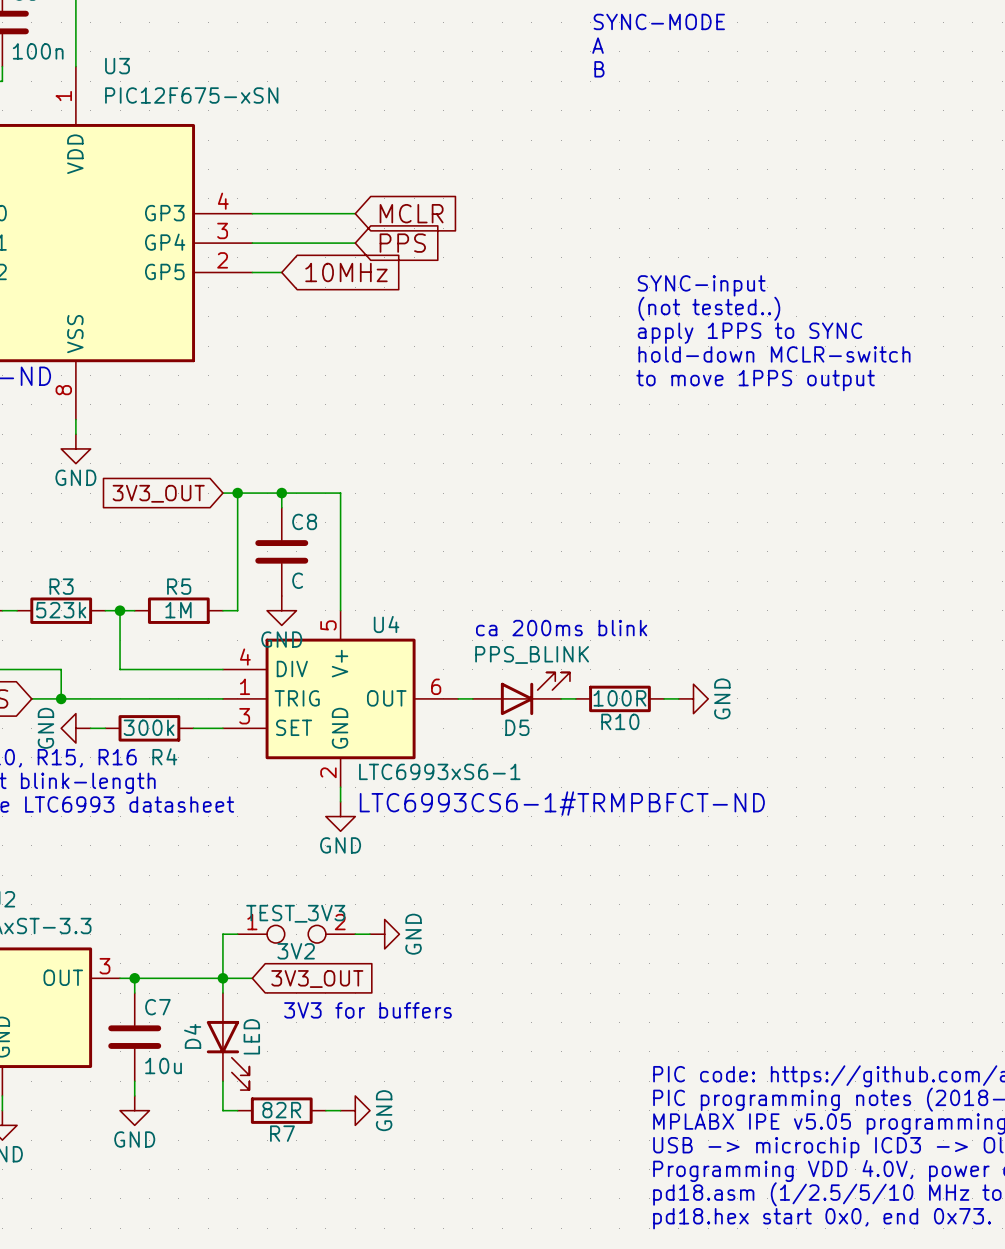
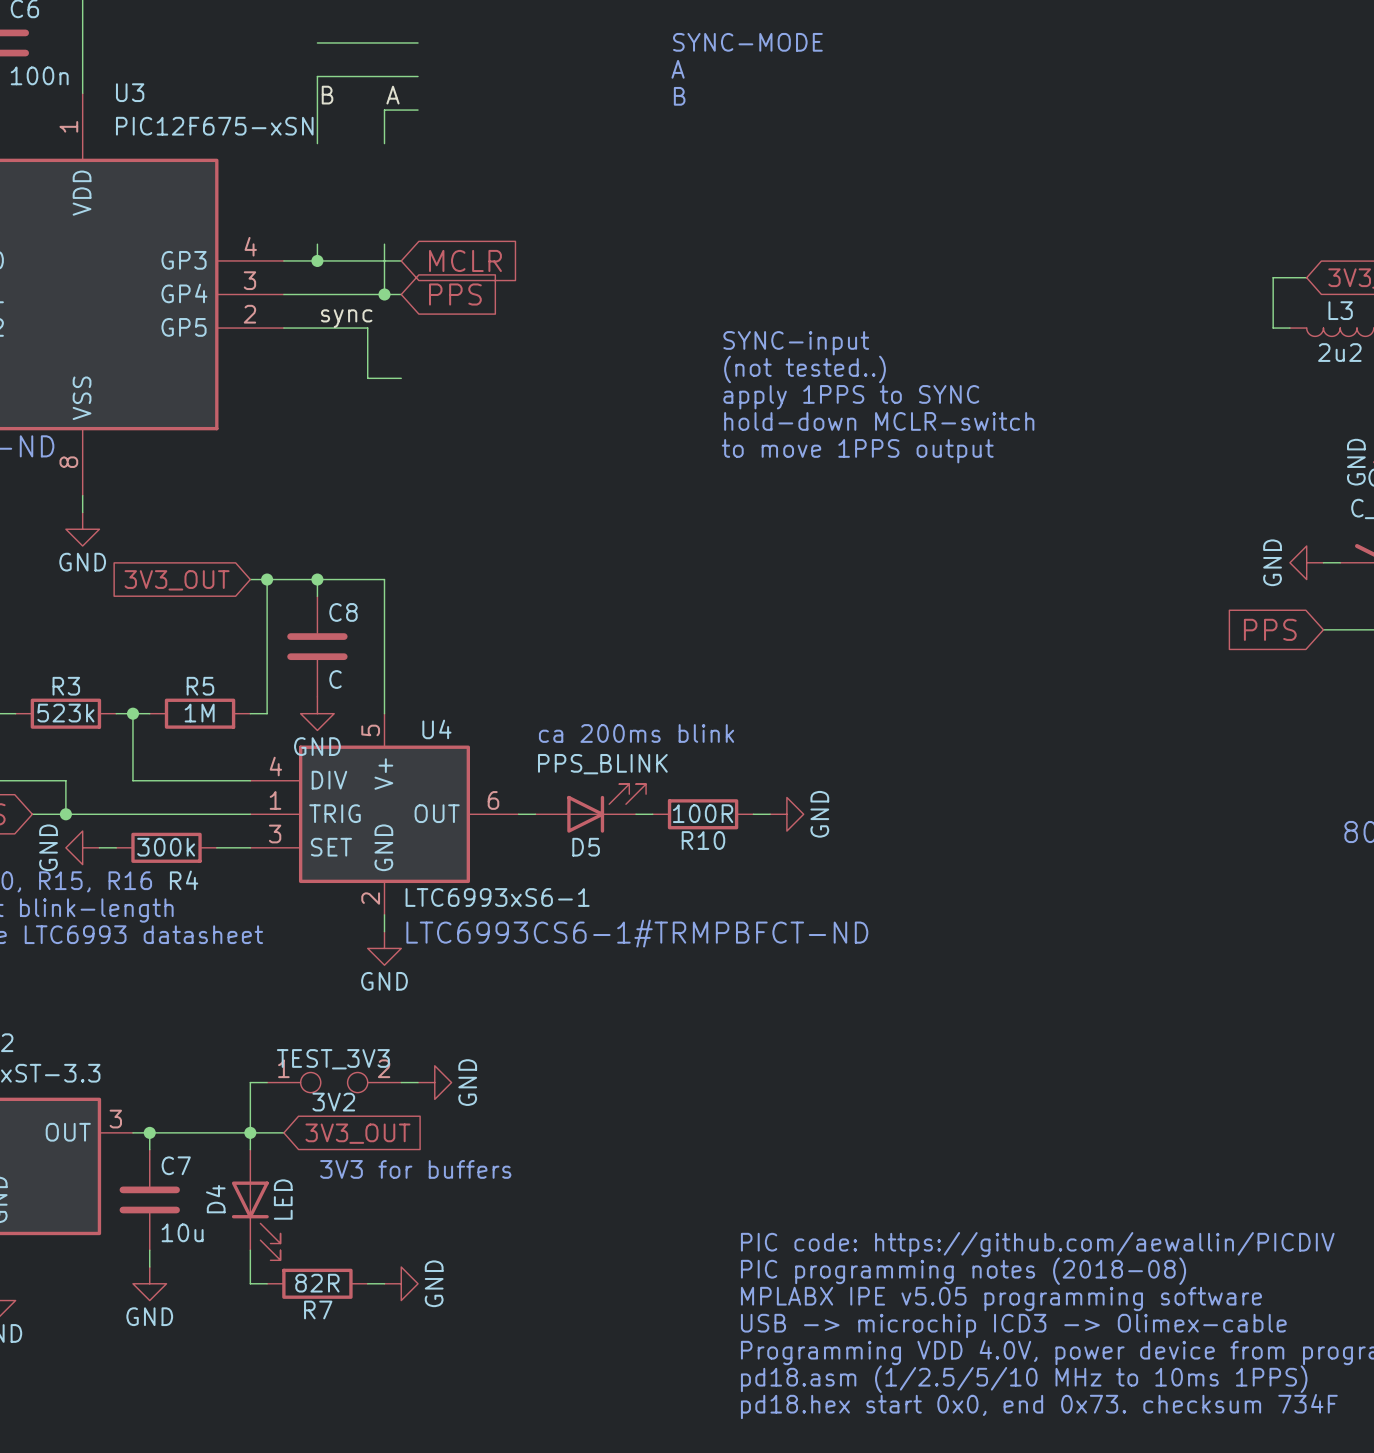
wire: none -> (317, 42) (418, 42)
wire: none -> (418, 76) (317, 76) (317, 143)
label: none -> B (327, 95)
label: none -> A (393, 95)
wire: none -> (418, 110) (384, 110) (384, 143)
wire: none -> (317, 244) (317, 260)
wire: none -> (384, 244) (384, 294)
junction: none -> (317, 260)
junction: none -> (384, 294)
label: none -> sync (346, 318)
wire: none -> (317, 328) (367, 328) (367, 378) (401, 378)
global label: 10MHz (346, 272) -> none

